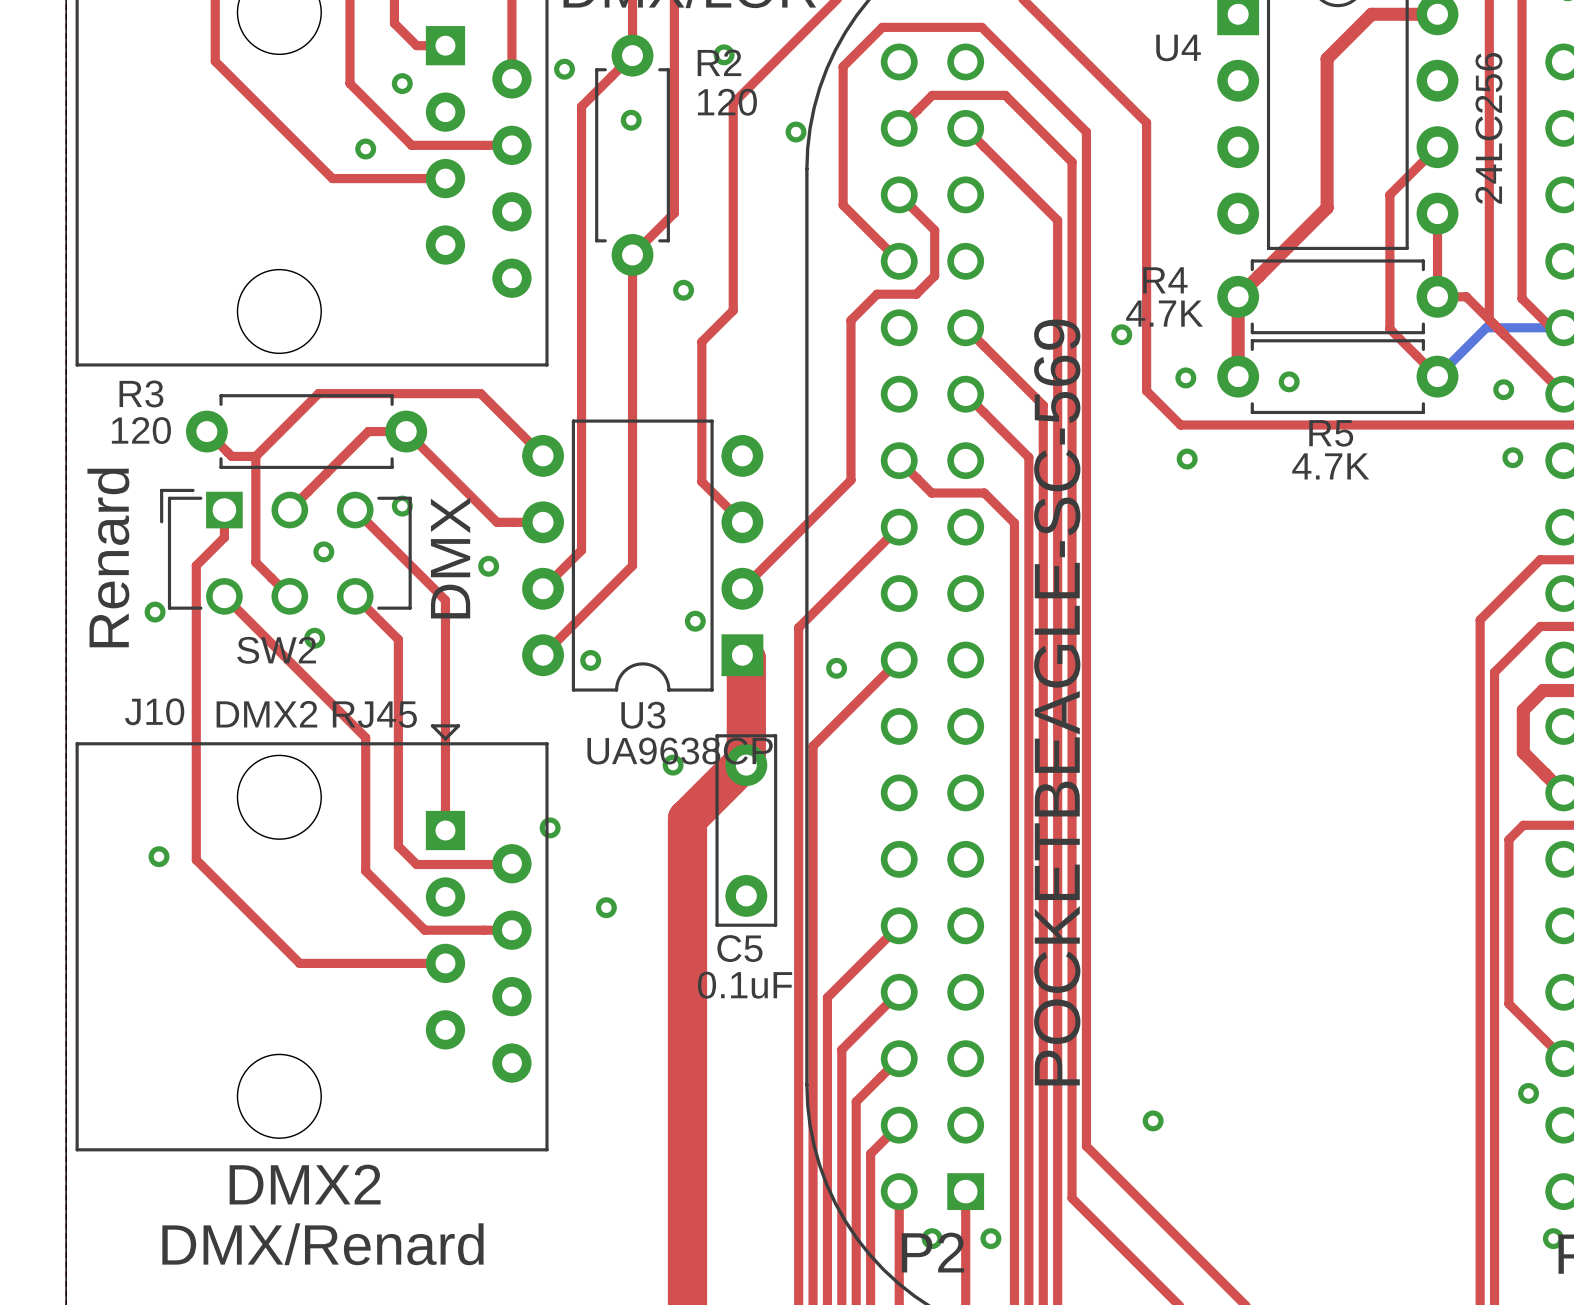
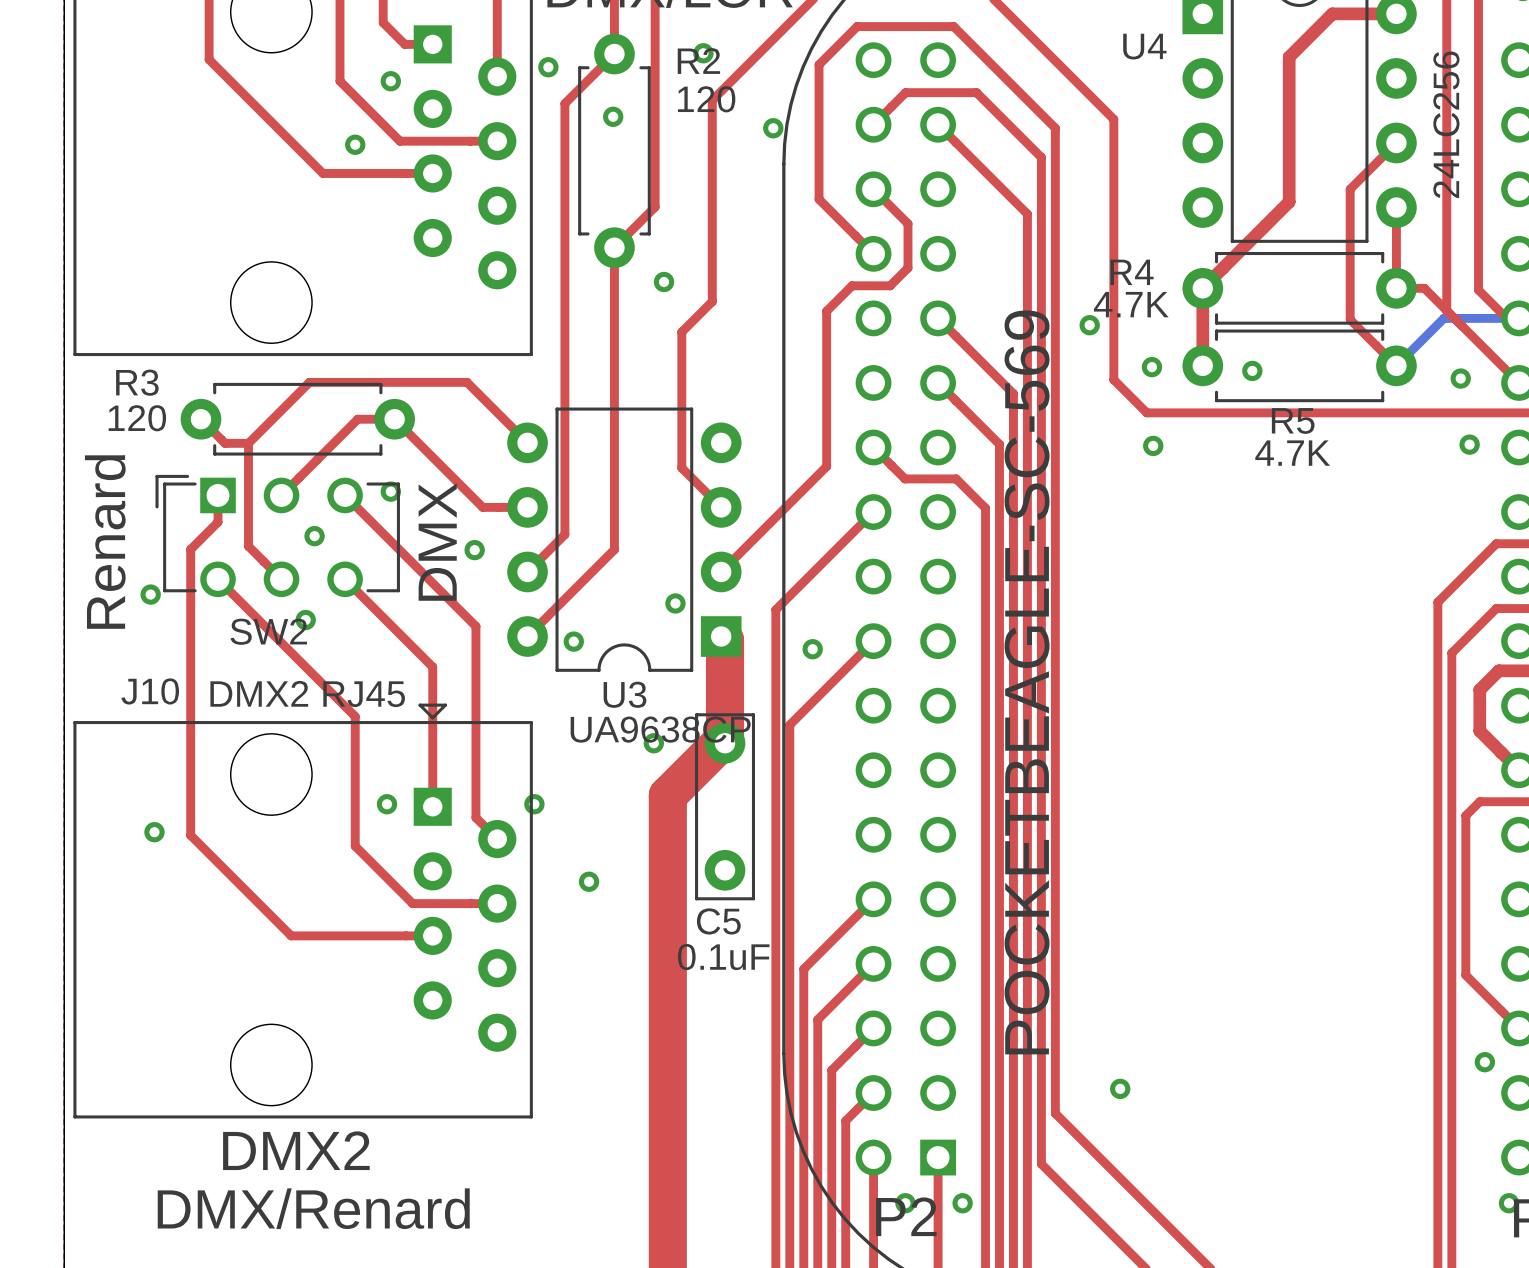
top track: (445, 600) (445, 686) -> (387, 621) (432, 667)
top track: none -> (432, 583) (475, 626) (475, 817) (496, 838)
top track: (398, 639) (398, 846) (416, 864) (511, 863) -> none
via: none -> (387, 804)

